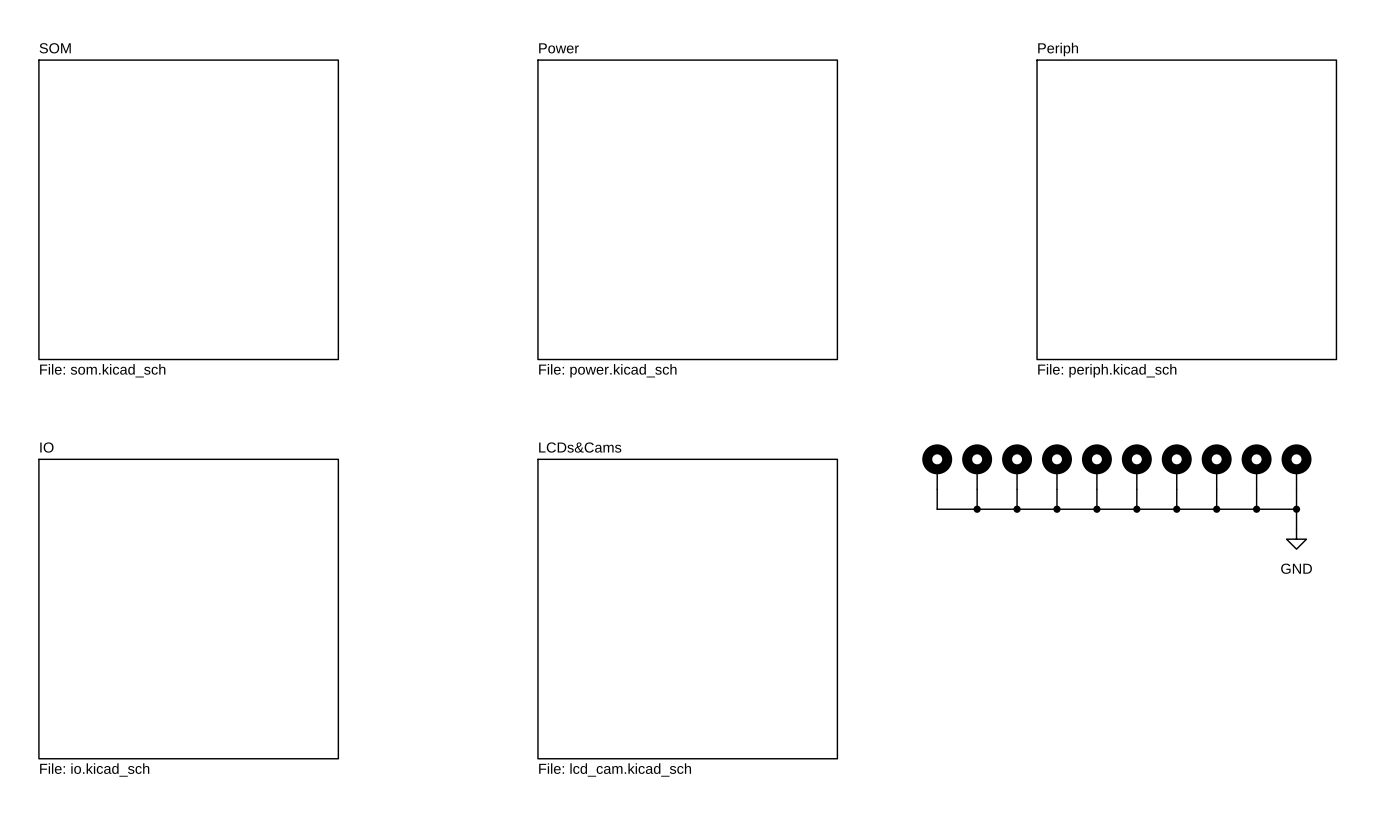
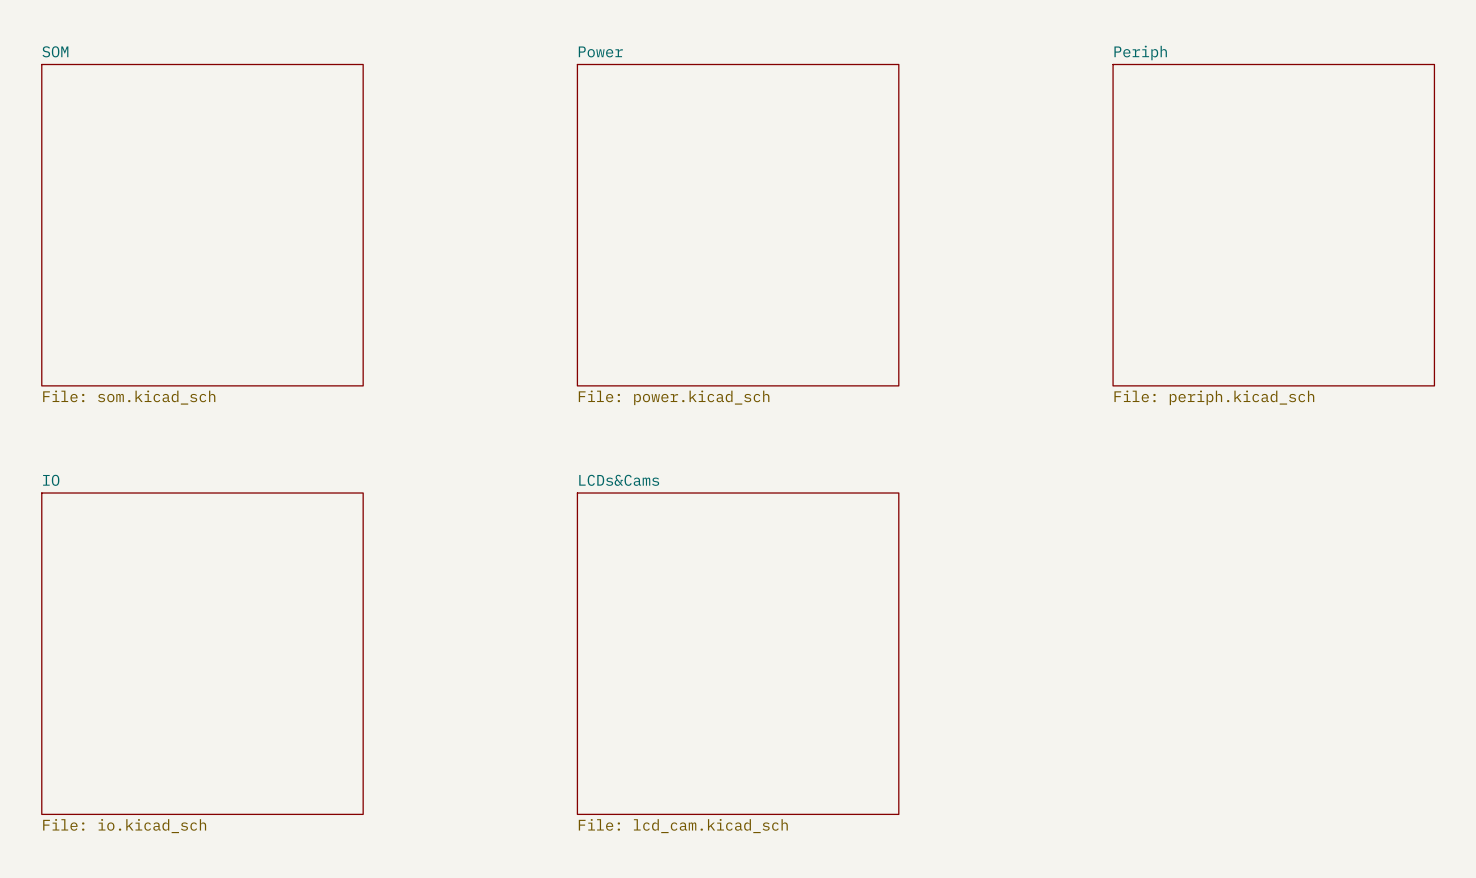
part: (937, 466) -> none
part: (977, 466) -> none
part: (1017, 466) -> none
part: (1056, 466) -> none
part: (1096, 466) -> none
part: (1136, 466) -> none
part: (1176, 466) -> none
part: (1216, 466) -> none
part: (1256, 466) -> none
part: (1296, 466) -> none
wire: (937, 489) (937, 509) (1296, 509) -> none
wire: (977, 489) (977, 509) -> none
wire: (1017, 489) (1017, 509) -> none
wire: (1056, 489) (1056, 509) -> none
wire: (1096, 489) (1096, 509) -> none
wire: (1136, 489) (1136, 509) -> none
wire: (1176, 489) (1176, 509) -> none
wire: (1216, 489) (1216, 509) -> none
wire: (1256, 489) (1256, 509) -> none
wire: (1296, 489) (1296, 529) -> none
junction: (977, 509) -> none
junction: (1017, 509) -> none
junction: (1056, 509) -> none
junction: (1096, 509) -> none
junction: (1136, 509) -> none
junction: (1176, 509) -> none
junction: (1216, 509) -> none
junction: (1256, 509) -> none
junction: (1296, 509) -> none
power symbol: GND (1296, 539) -> none

